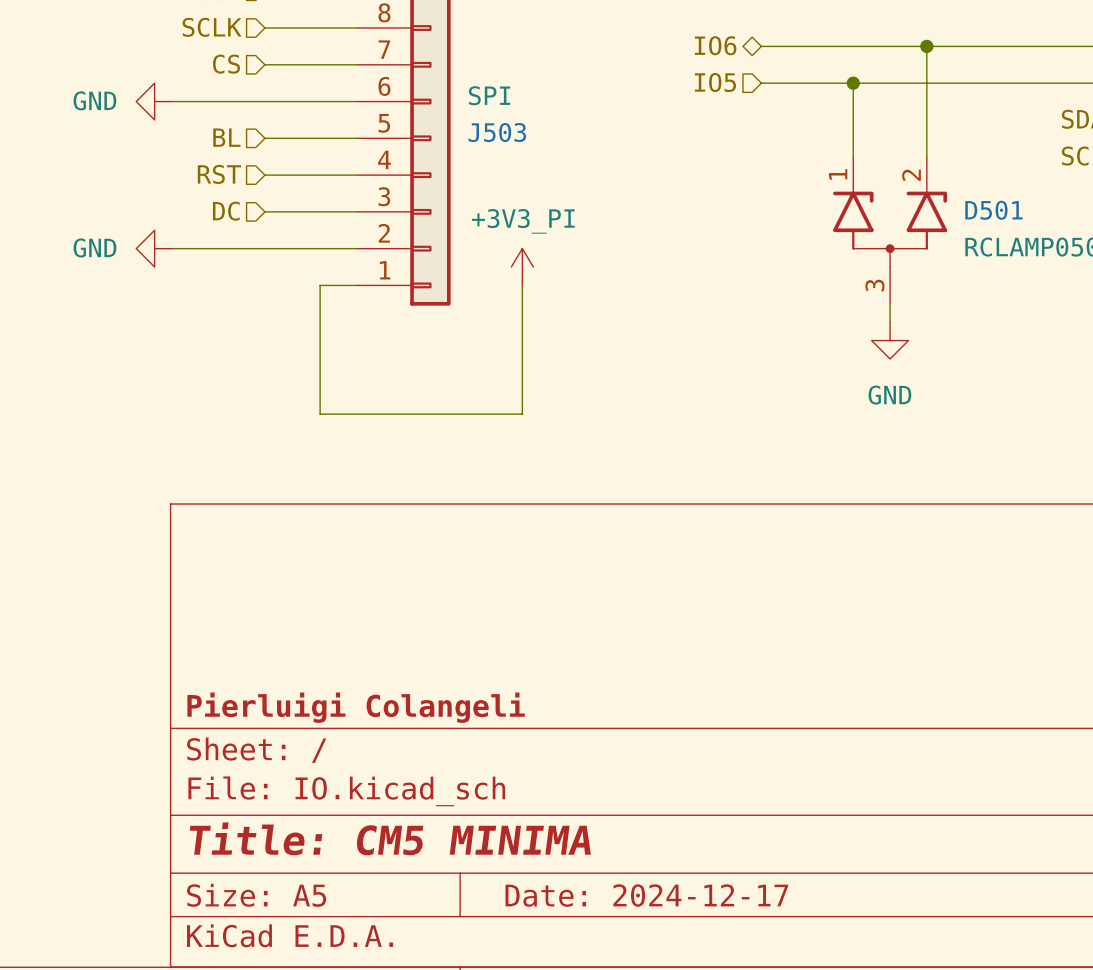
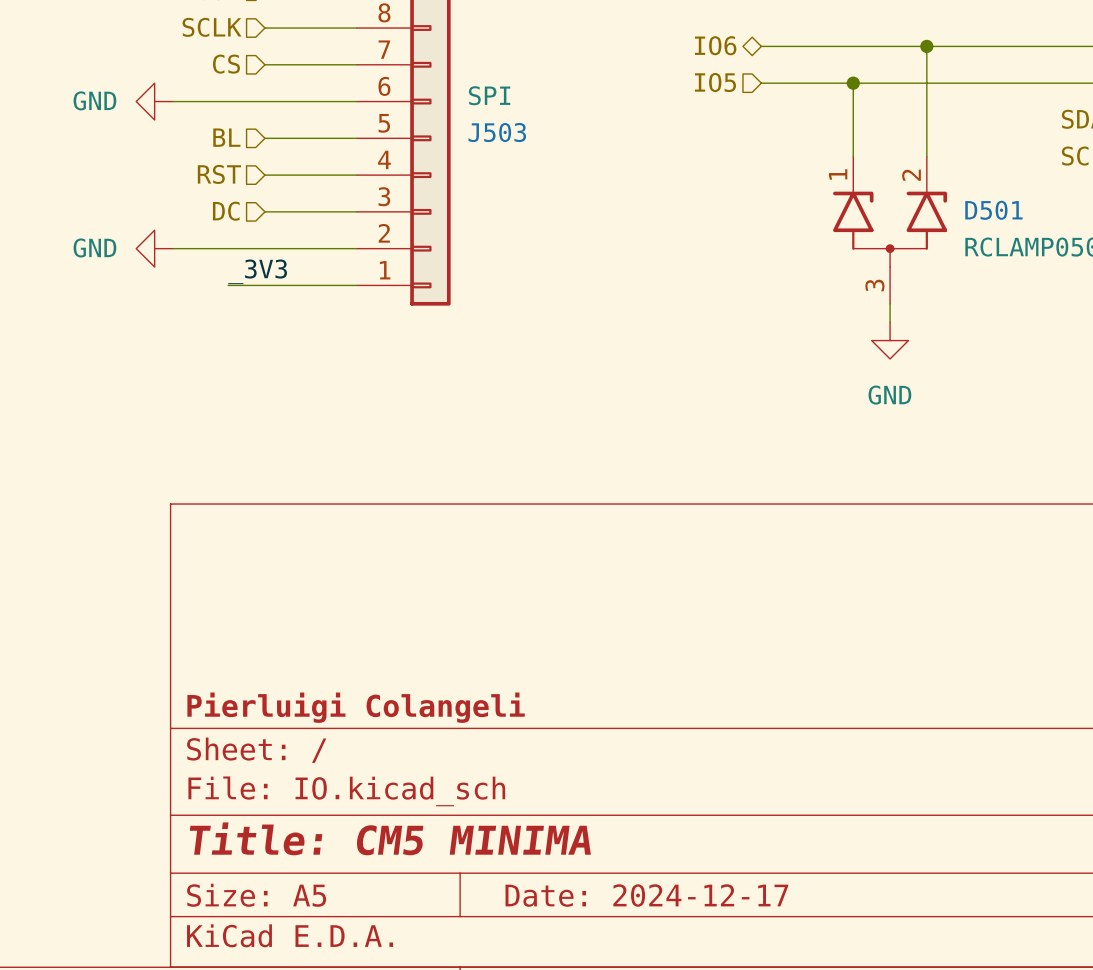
power symbol: +3V3_PI (522, 267) -> none
label: none -> _3V3 (257, 271)
wire: (320, 285) (320, 414) (522, 414) (522, 285) -> (320, 285) (228, 285)

